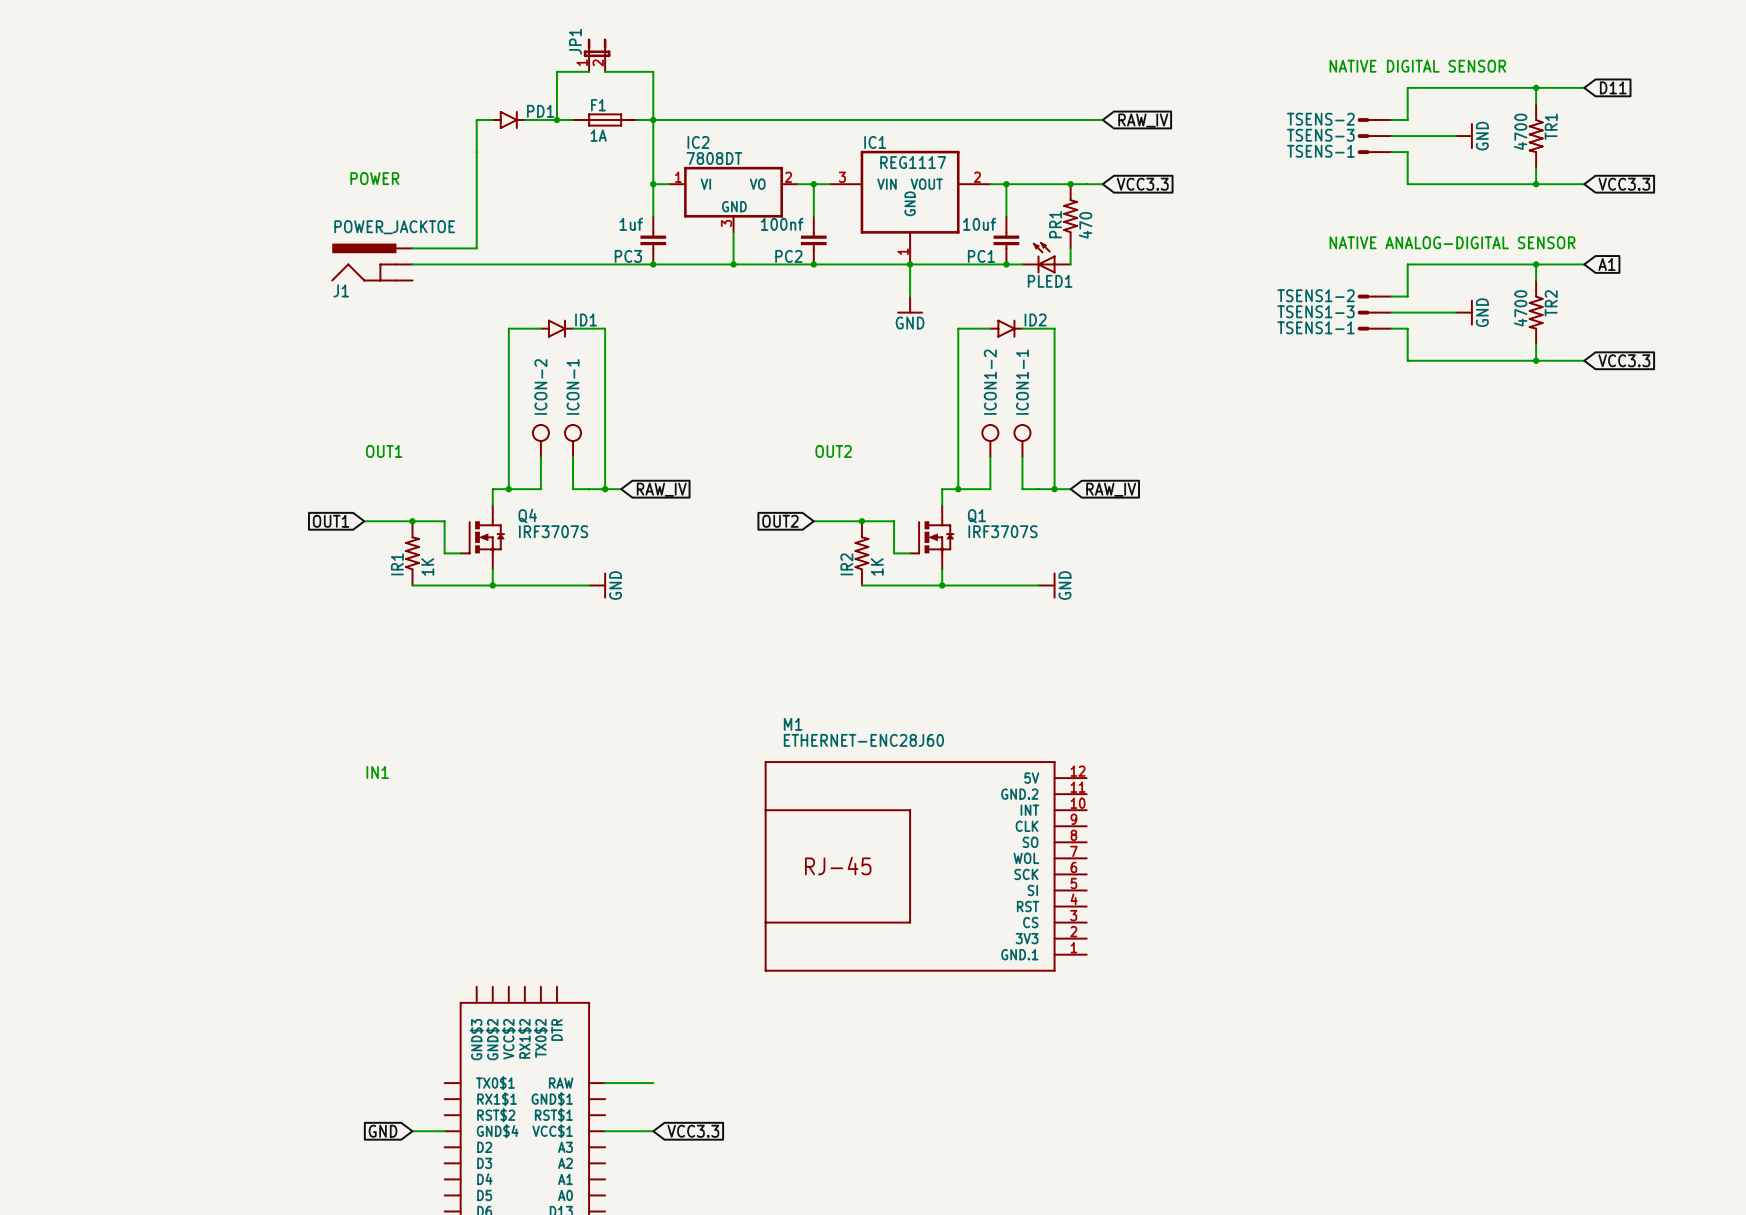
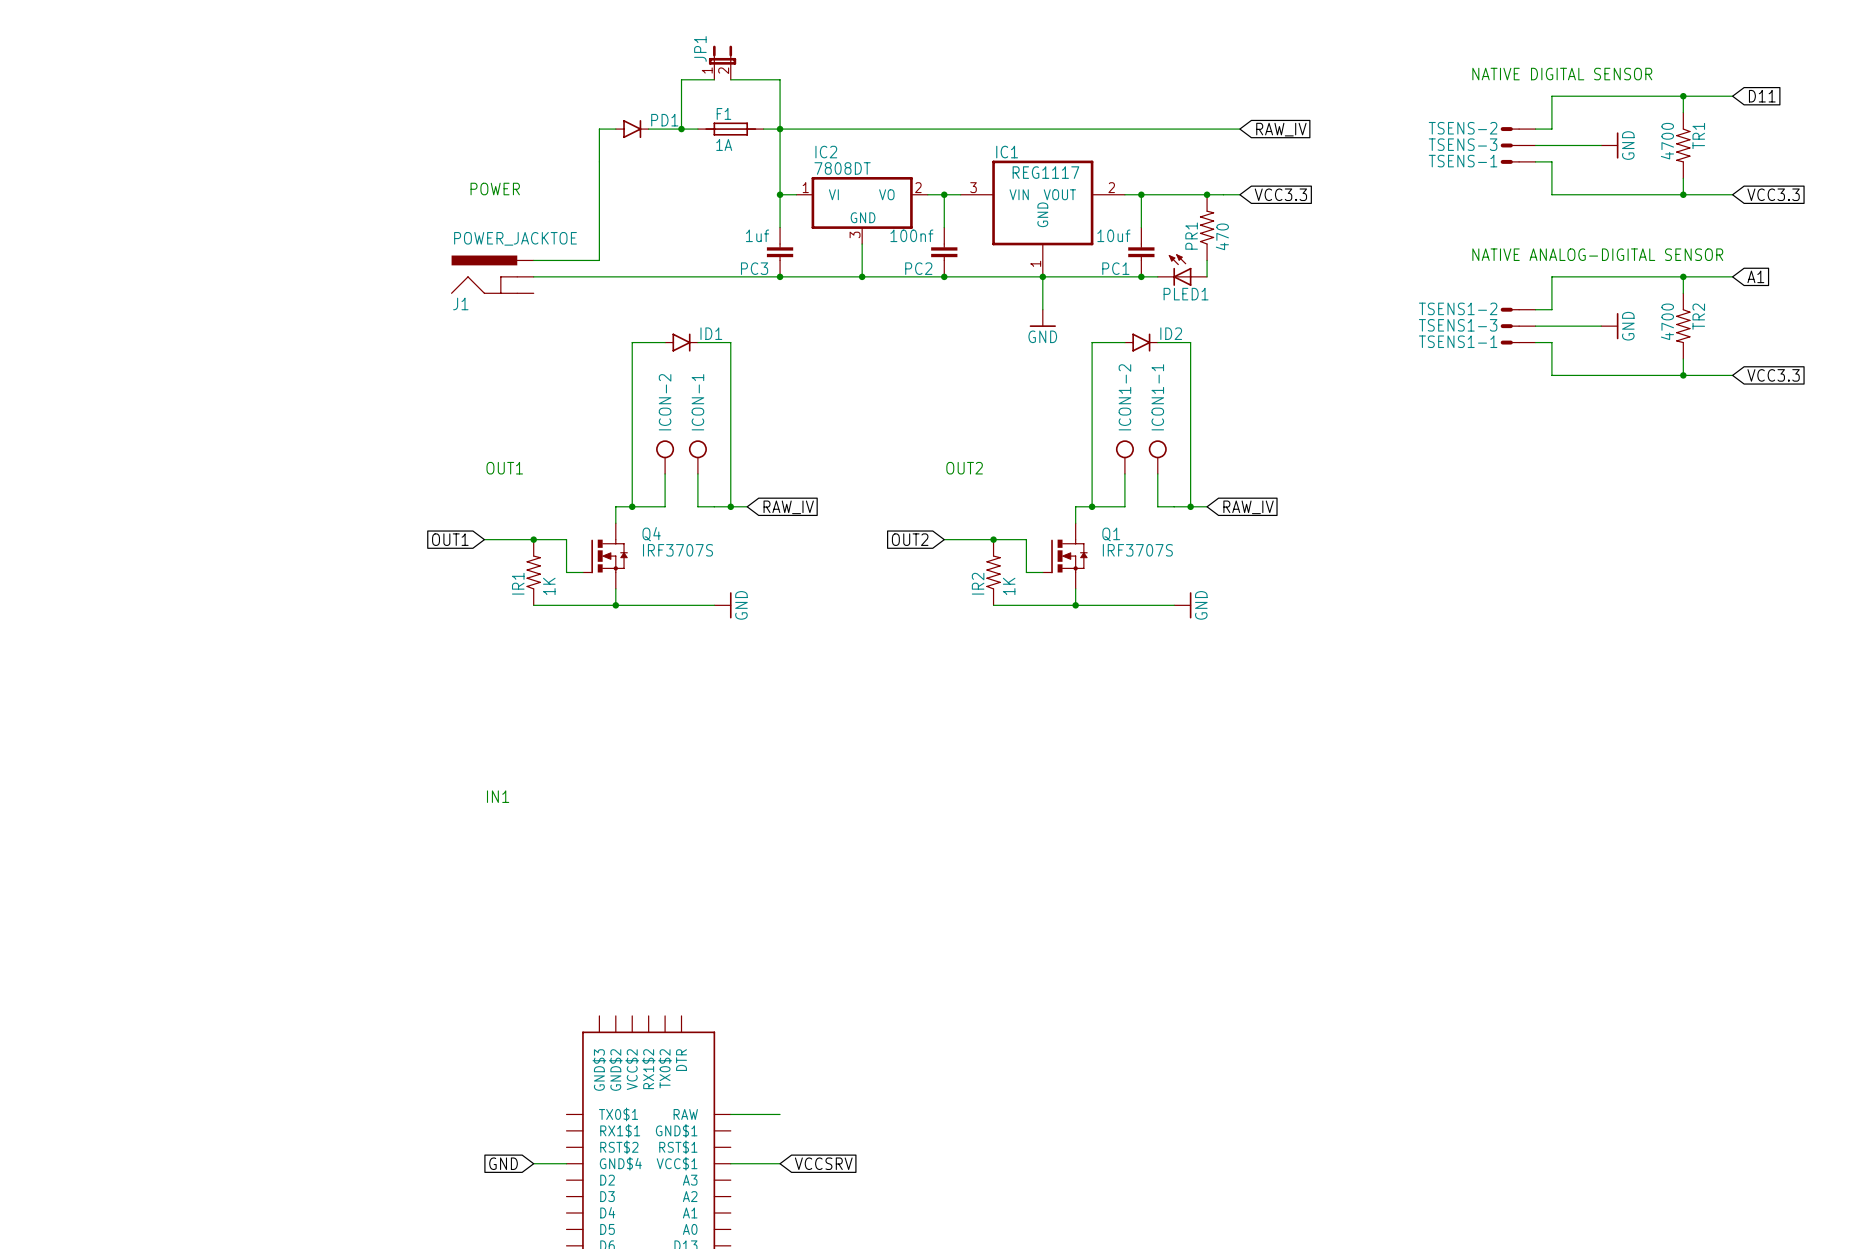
M1: ETHERNET-ENC28J60 (925, 866) -> none
global label: VCC3.3 (693, 1131) -> VCCSRV (823, 1163)

